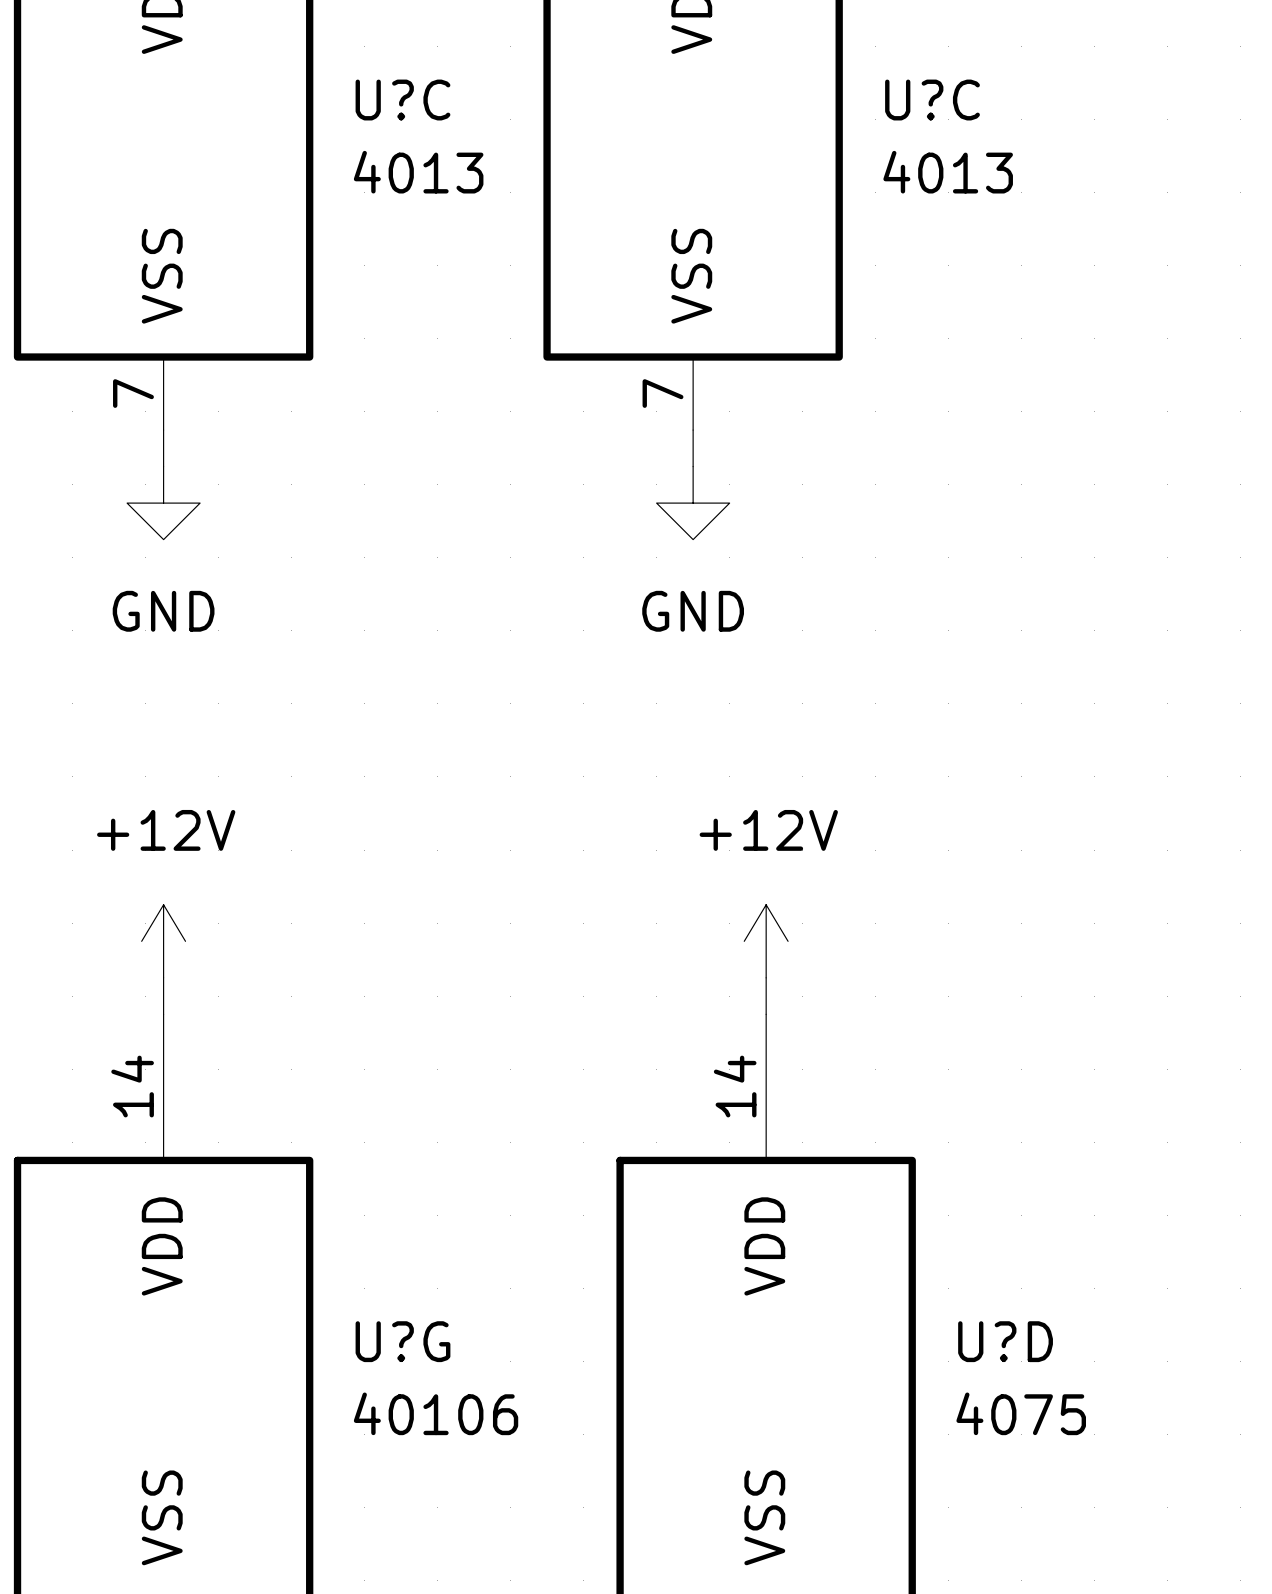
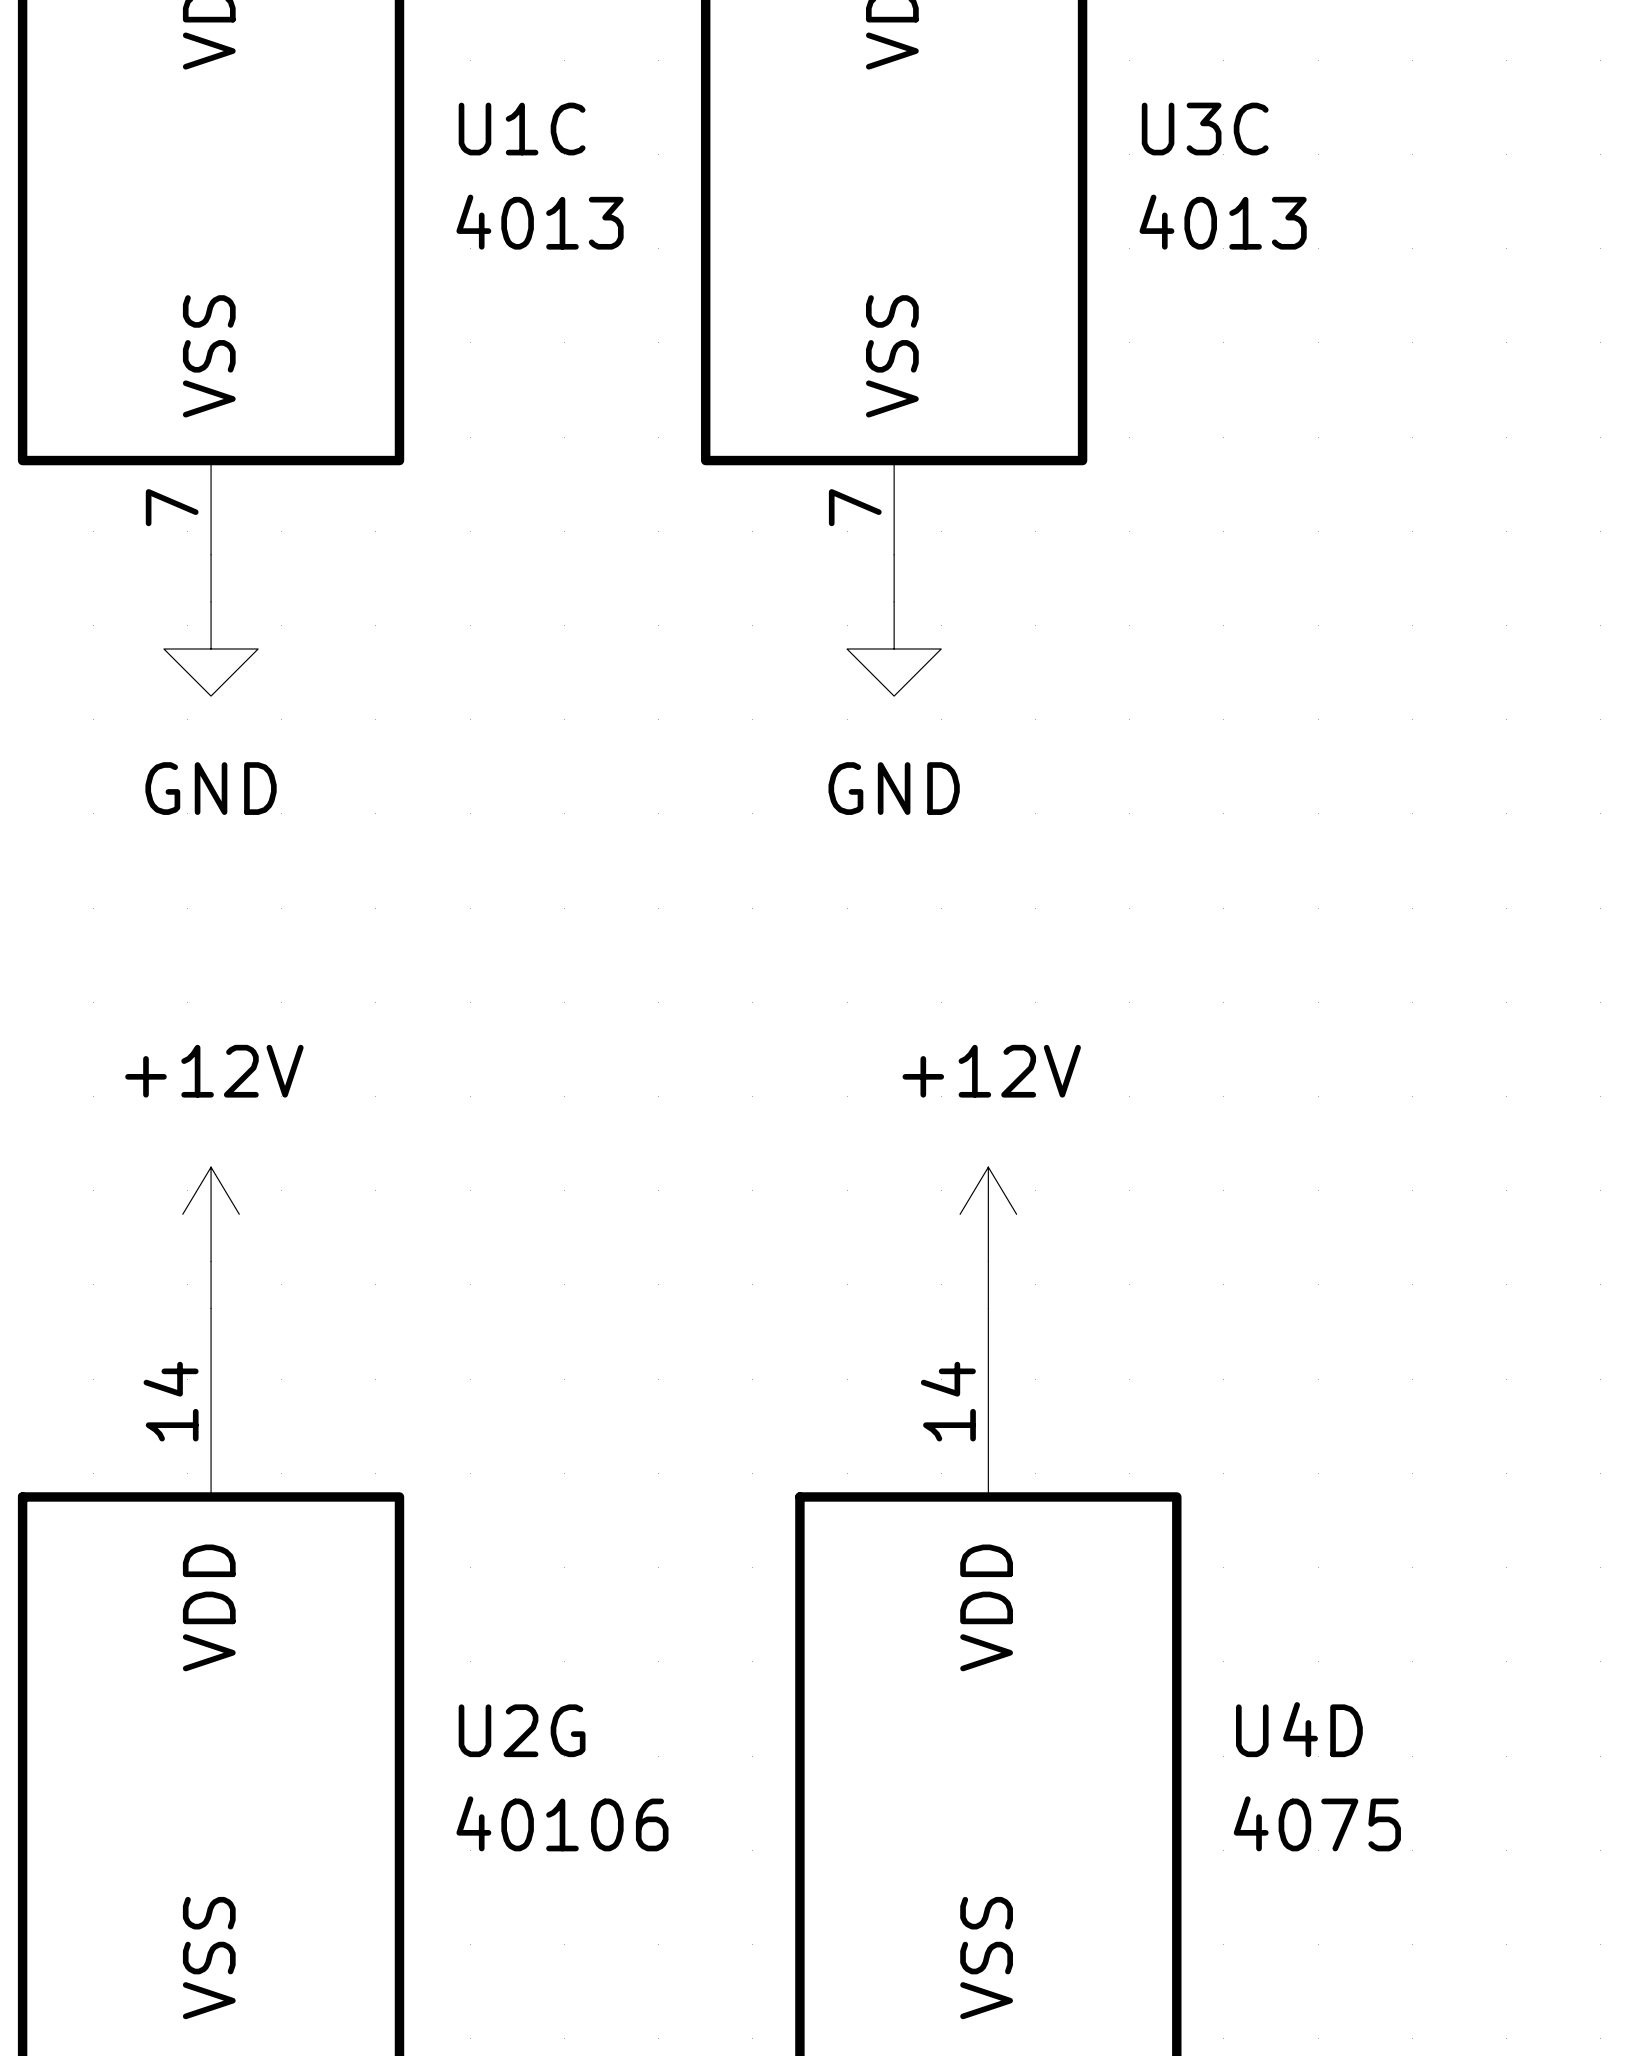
U?C name: U?C (402, 100) -> U1C (522, 129)
U?C name: U?C (932, 100) -> U3C (1205, 129)
U?G name: U?G (402, 1341) -> U2G (522, 1730)
U?D name: U?D (1005, 1341) -> U4D (1299, 1729)

